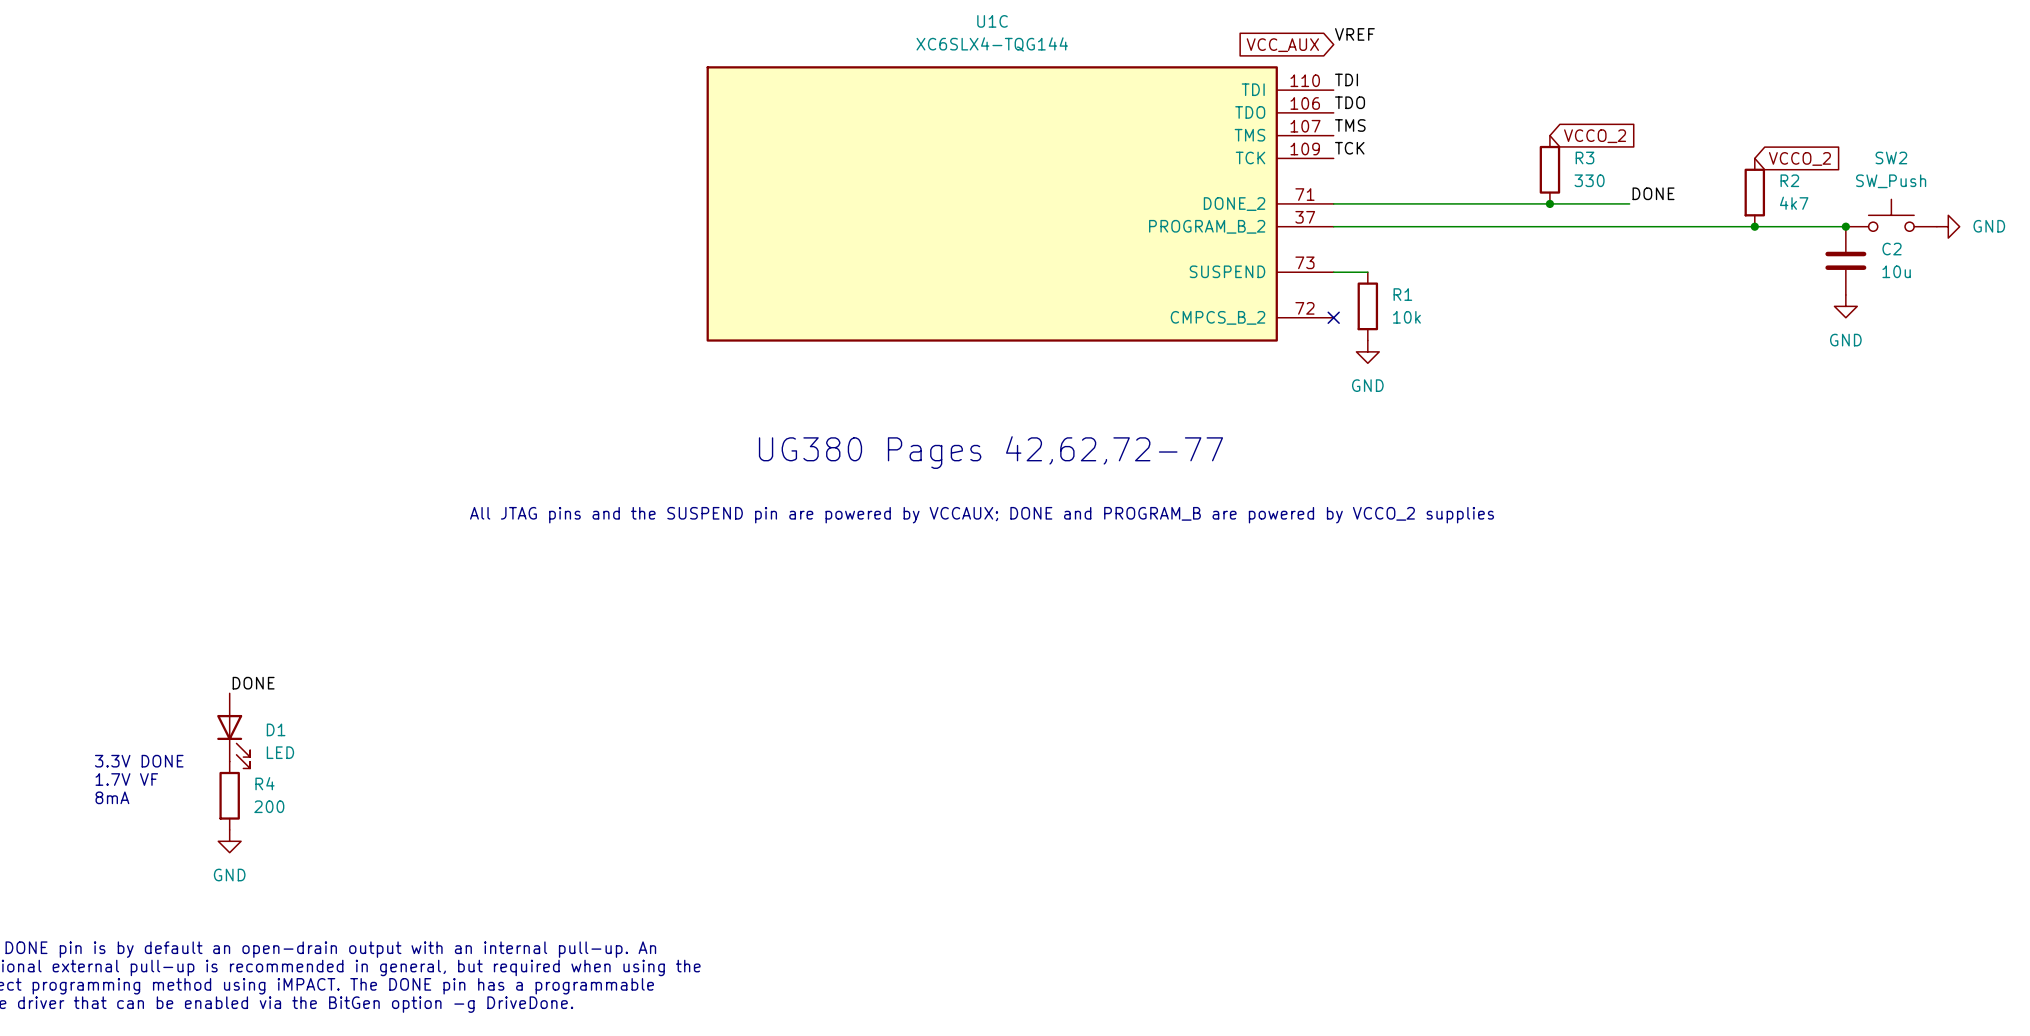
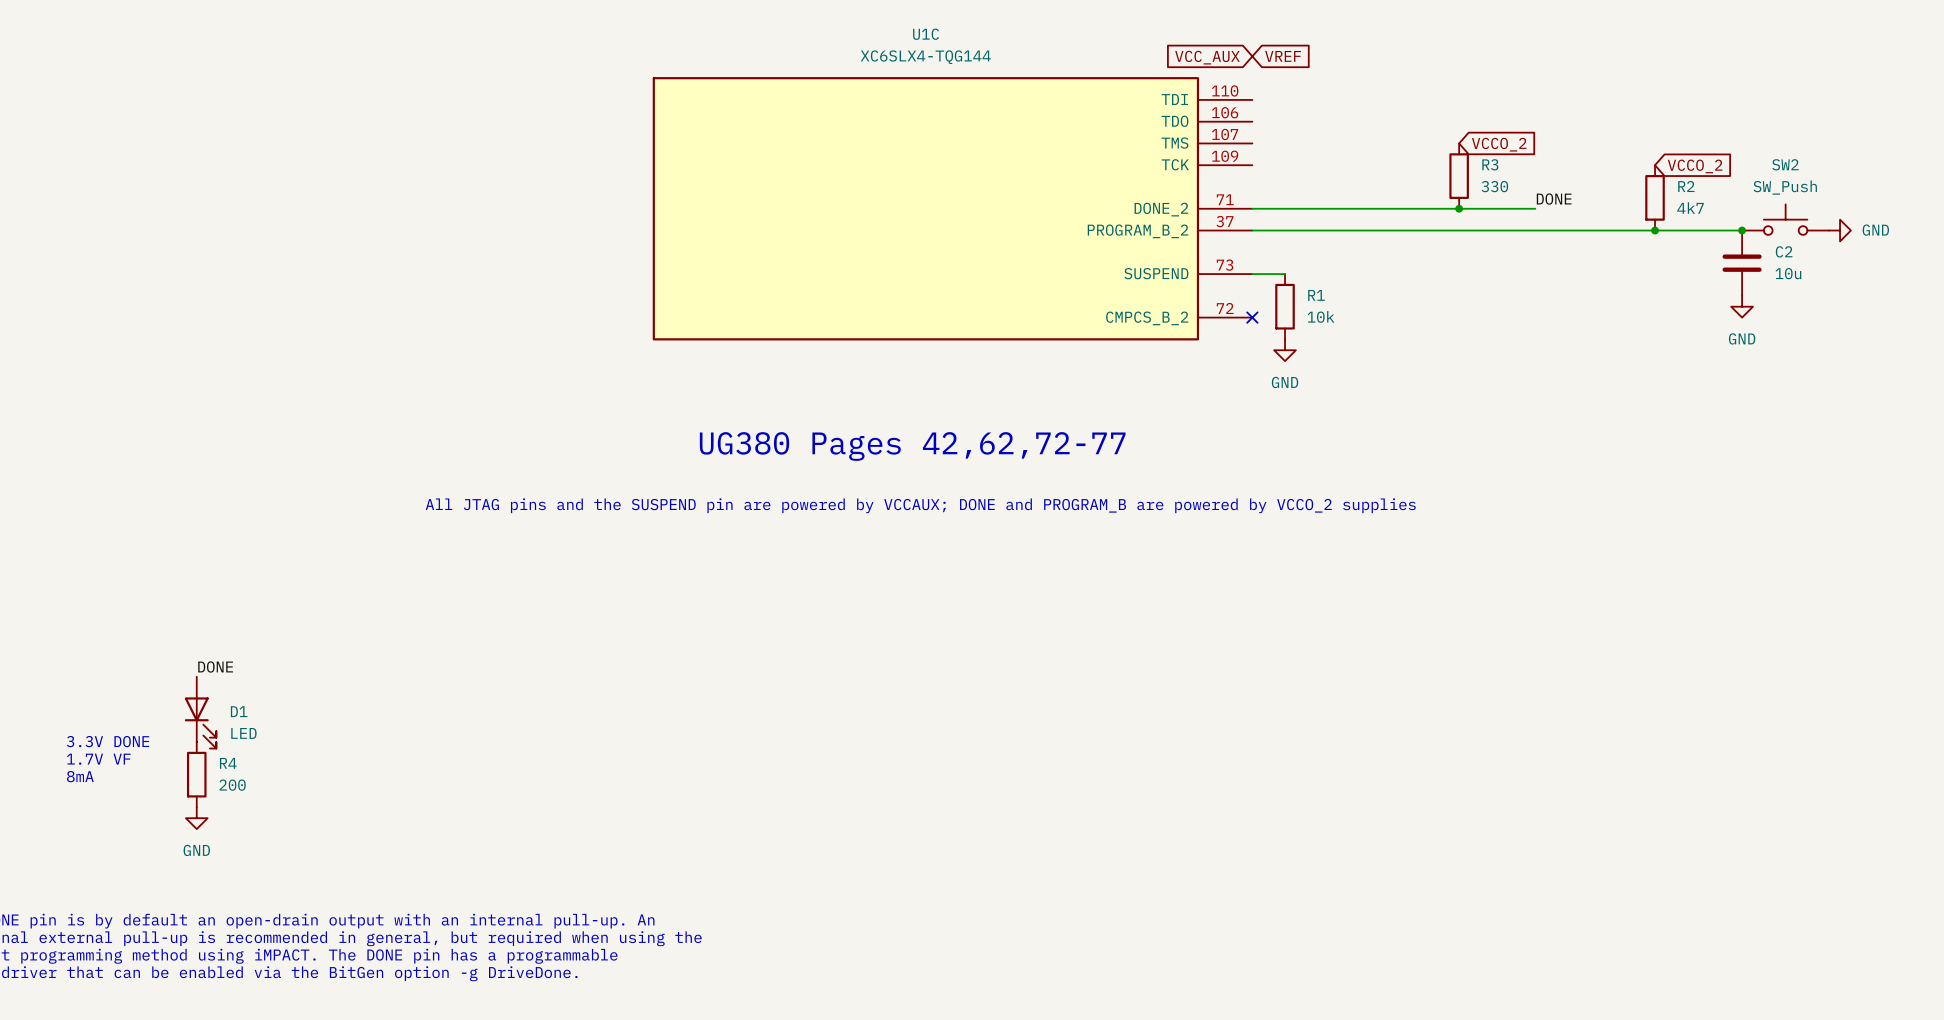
label: VREF (1354, 34) -> none
global label: none -> VREF (1283, 56)
label: TDI (1346, 79) -> none
label: TDO (1350, 102) -> none
label: TMS (1350, 125) -> none
label: TCK (1349, 148) -> none

